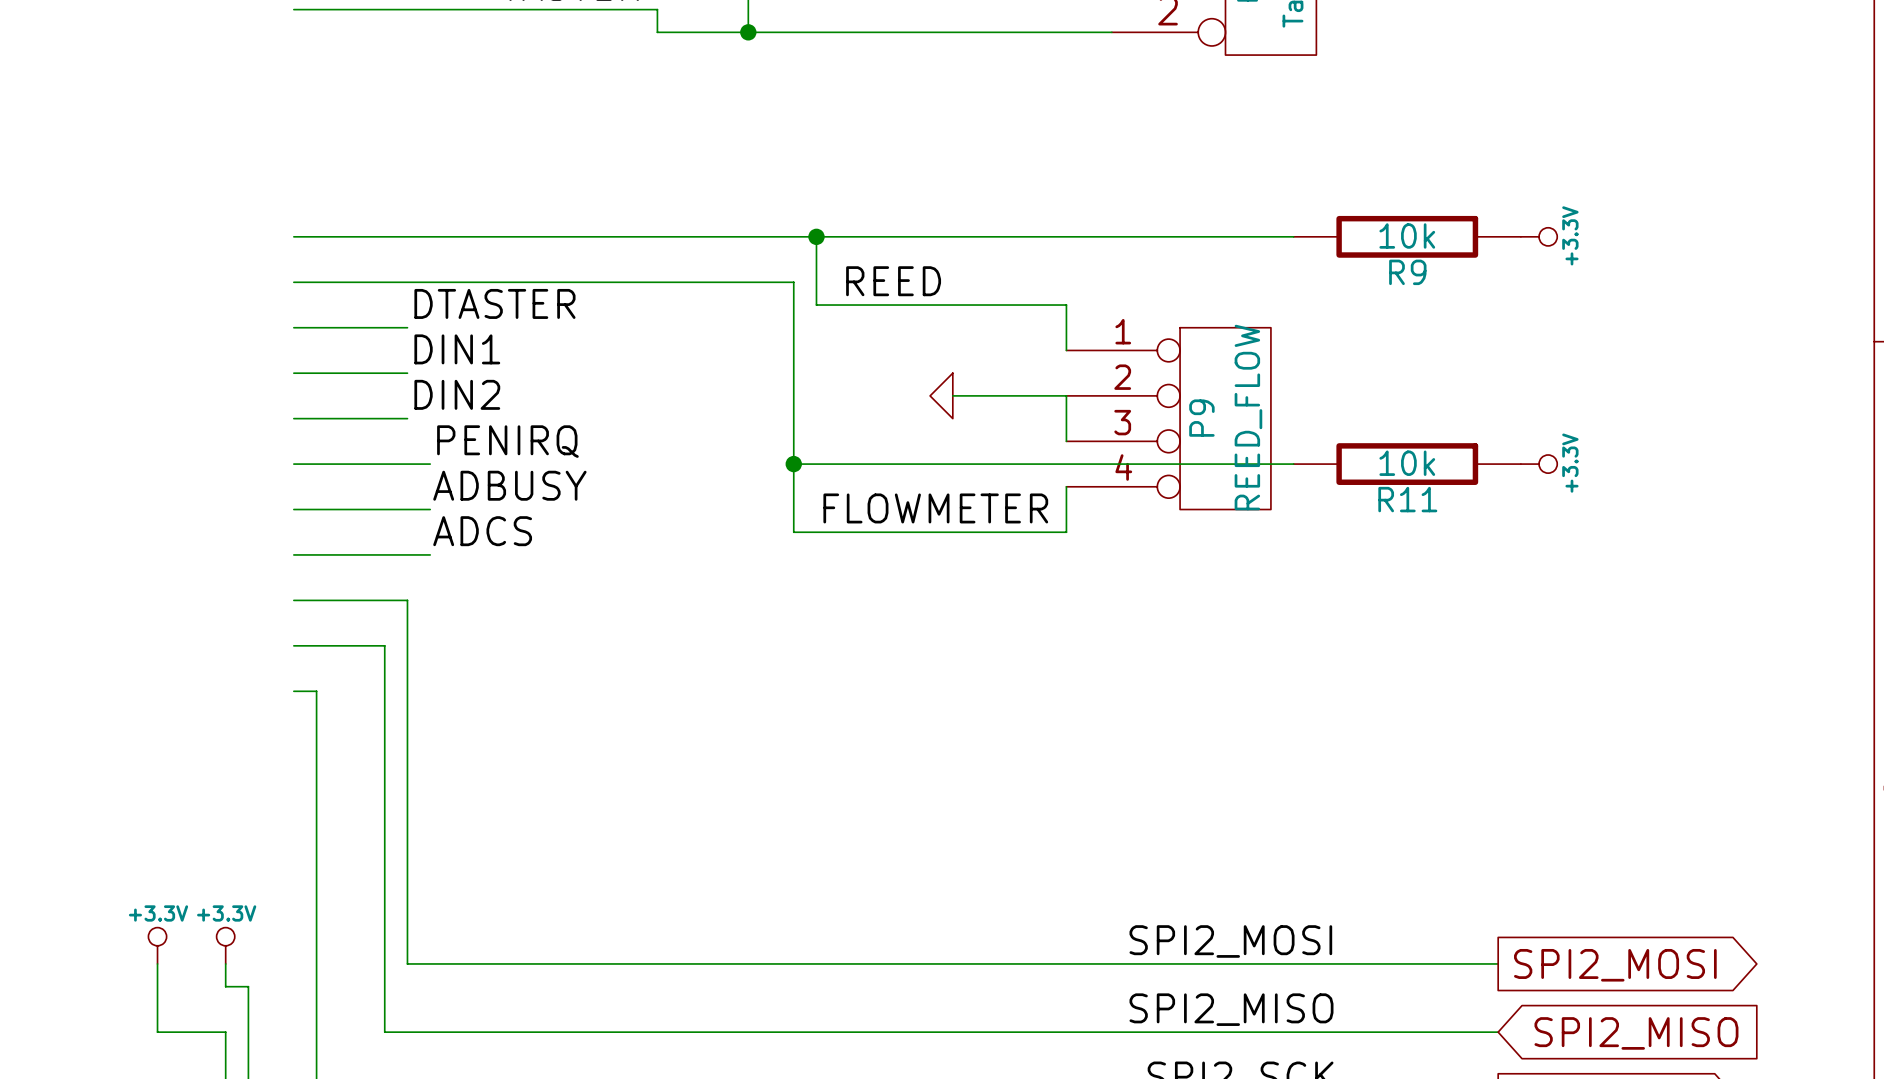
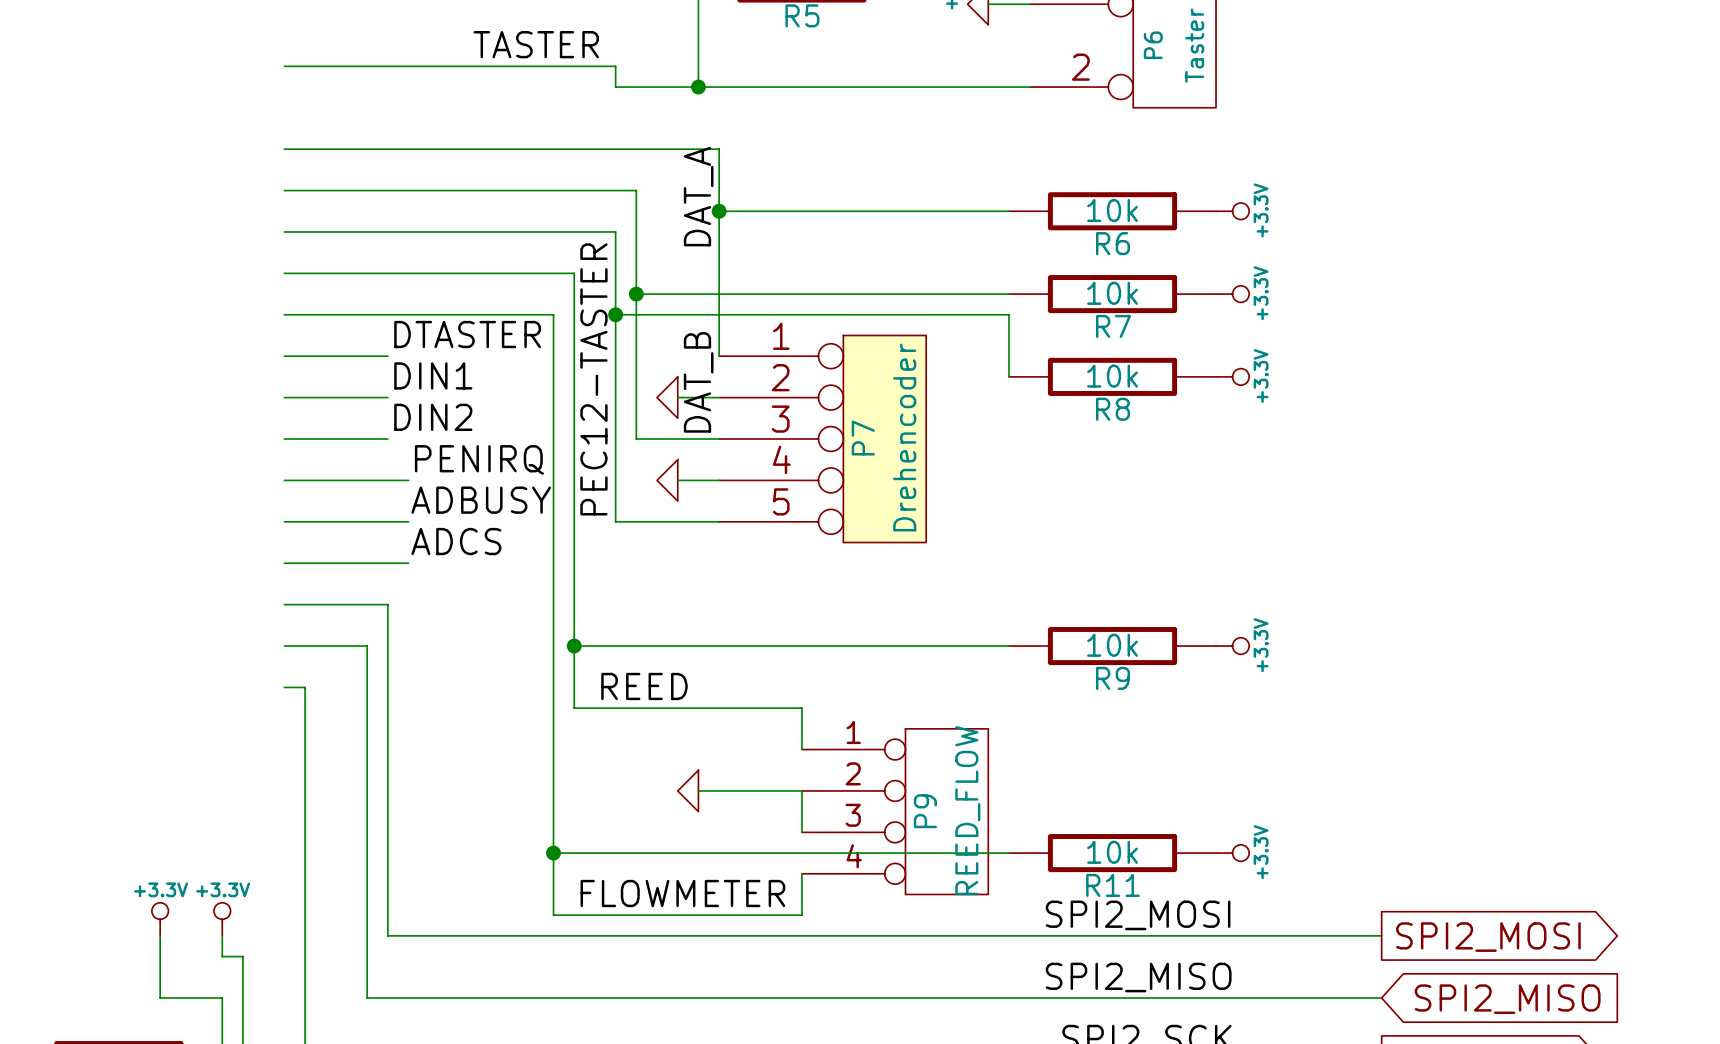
wire: none -> (284, 149) (719, 149) (719, 356)
wire: none -> (284, 190) (636, 190) (636, 439) (719, 439)
label: none -> DAT_A (698, 196)
wire: none -> (719, 211) (1008, 211)
junction: none -> (719, 211)
R6: none -> 10k (1112, 211)
power symbol: none -> +3.3V (1232, 211)
wire: none -> (284, 231) (615, 231) (615, 521) (719, 521)
wire: (611, 236) (1293, 236) -> (574, 273) (574, 708) (801, 708) (801, 749)
wire: (816, 236) (816, 305) (1066, 305) (1066, 350) -> none
junction: (816, 236) -> none
R9 position: (1407, 236) -> (1112, 646)
power symbol: +3.3V (1539, 236) -> none
wire: none -> (636, 294) (1008, 294)
junction: none -> (636, 294)
R7: none -> 10k (1112, 294)
power symbol: none -> +3.3V (1232, 294)
label: REED (893, 281) -> none
wire: (589, 282) (657, 282) -> (553, 314) (553, 915) (801, 915) (801, 873)
junction: none -> (615, 314)
wire: (793, 282) (793, 532) (1066, 532) (1066, 486) -> (739, 314) (1008, 314) (1008, 376)
R8: none -> 10k (1112, 376)
power symbol: none -> +3.3V (1232, 376)
label: none -> PEC12-TASTER (593, 379)
label: none -> DAT_B (698, 382)
power symbol: none -> (667, 397)
wire: none -> (677, 397) (719, 397)
power symbol: (941, 395) -> none
wire: (952, 395) (1066, 395) (1066, 441) -> none
P7: none -> Drehencoder (822, 439)
P9 position: (1168, 418) -> (895, 811)
power symbol: none -> (667, 480)
wire: none -> (677, 480) (719, 480)
wire: (793, 464) (1293, 464) -> none
junction: (793, 464) -> none
R11 position: (1407, 464) -> (1112, 853)
power symbol: +3.3V (1539, 464) -> none
label: FLOWMETER (935, 508) -> none
wire: none -> (574, 646) (1008, 646)
junction: none -> (574, 646)
power symbol: none -> +3.3V (1232, 646)
label: none -> REED (644, 686)
power symbol: none -> (688, 790)
wire: none -> (698, 790) (801, 790) (801, 832)
wire: none -> (553, 853) (1008, 853)
junction: none -> (553, 853)
power symbol: none -> +3.3V (1232, 853)
label: none -> FLOWMETER (682, 893)

